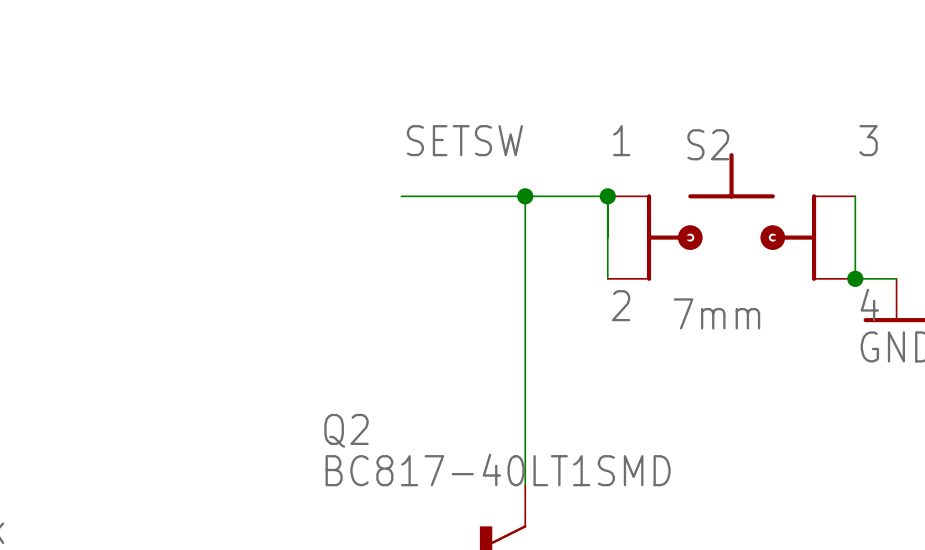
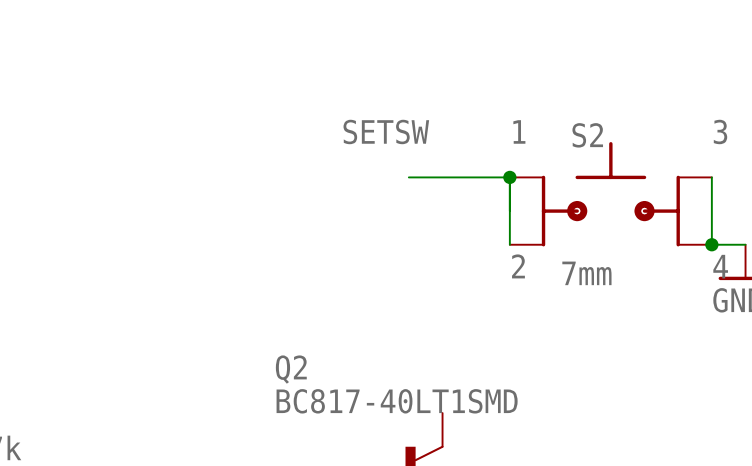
wire: (401, 196) (484, 196) -> none
wire: (525, 196) (525, 485) -> none
junction: (525, 196) -> none

